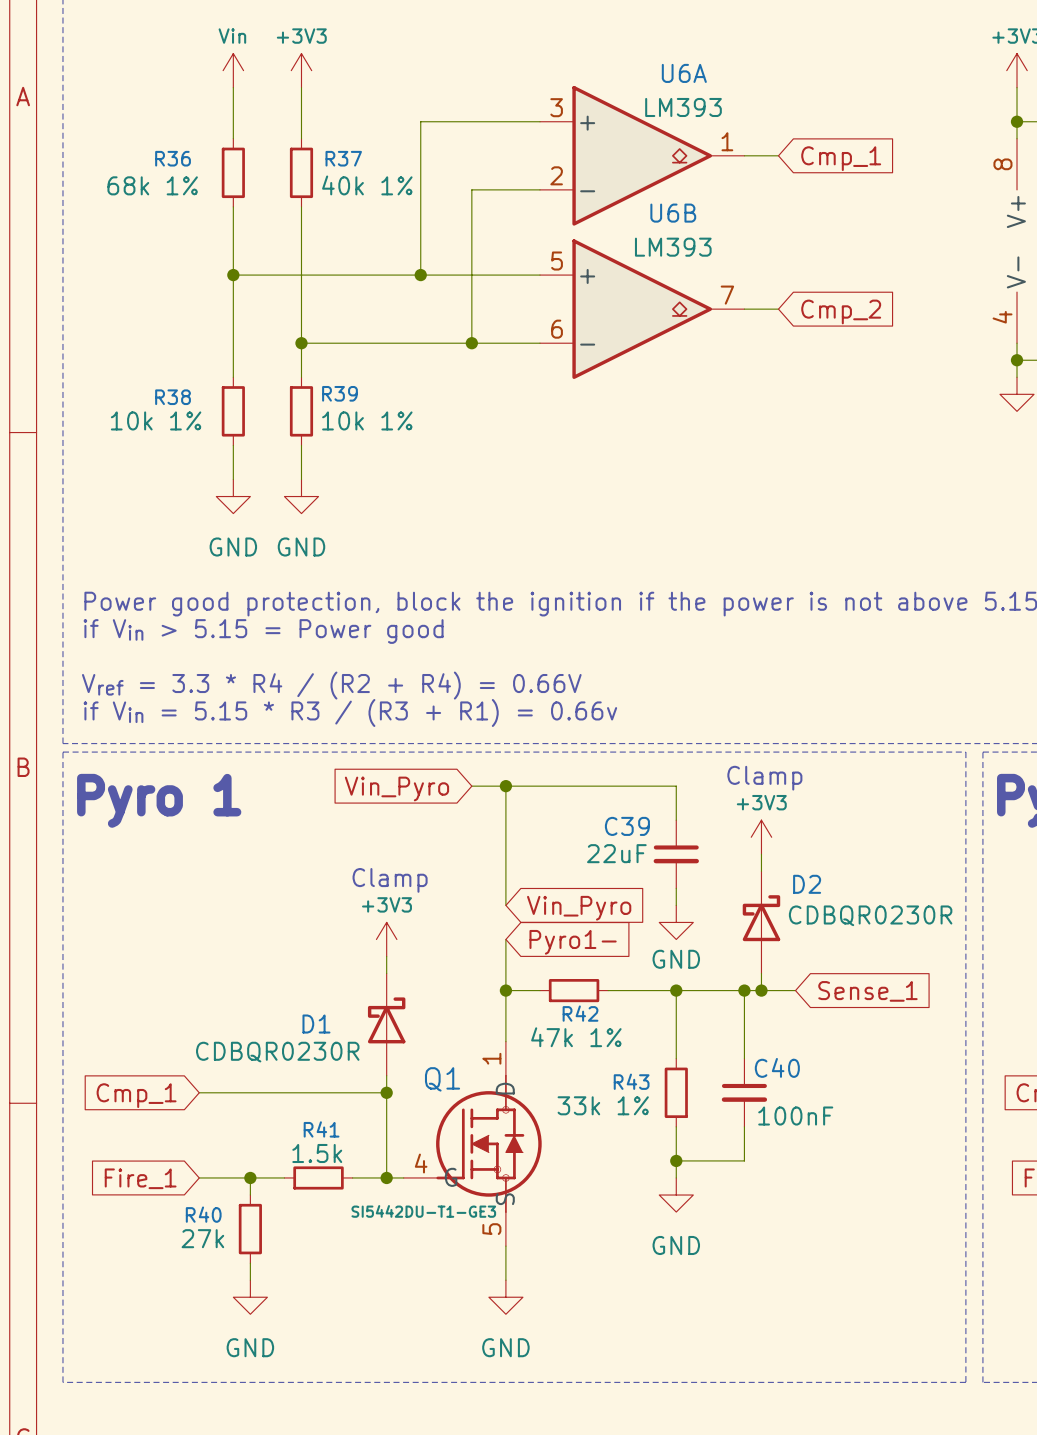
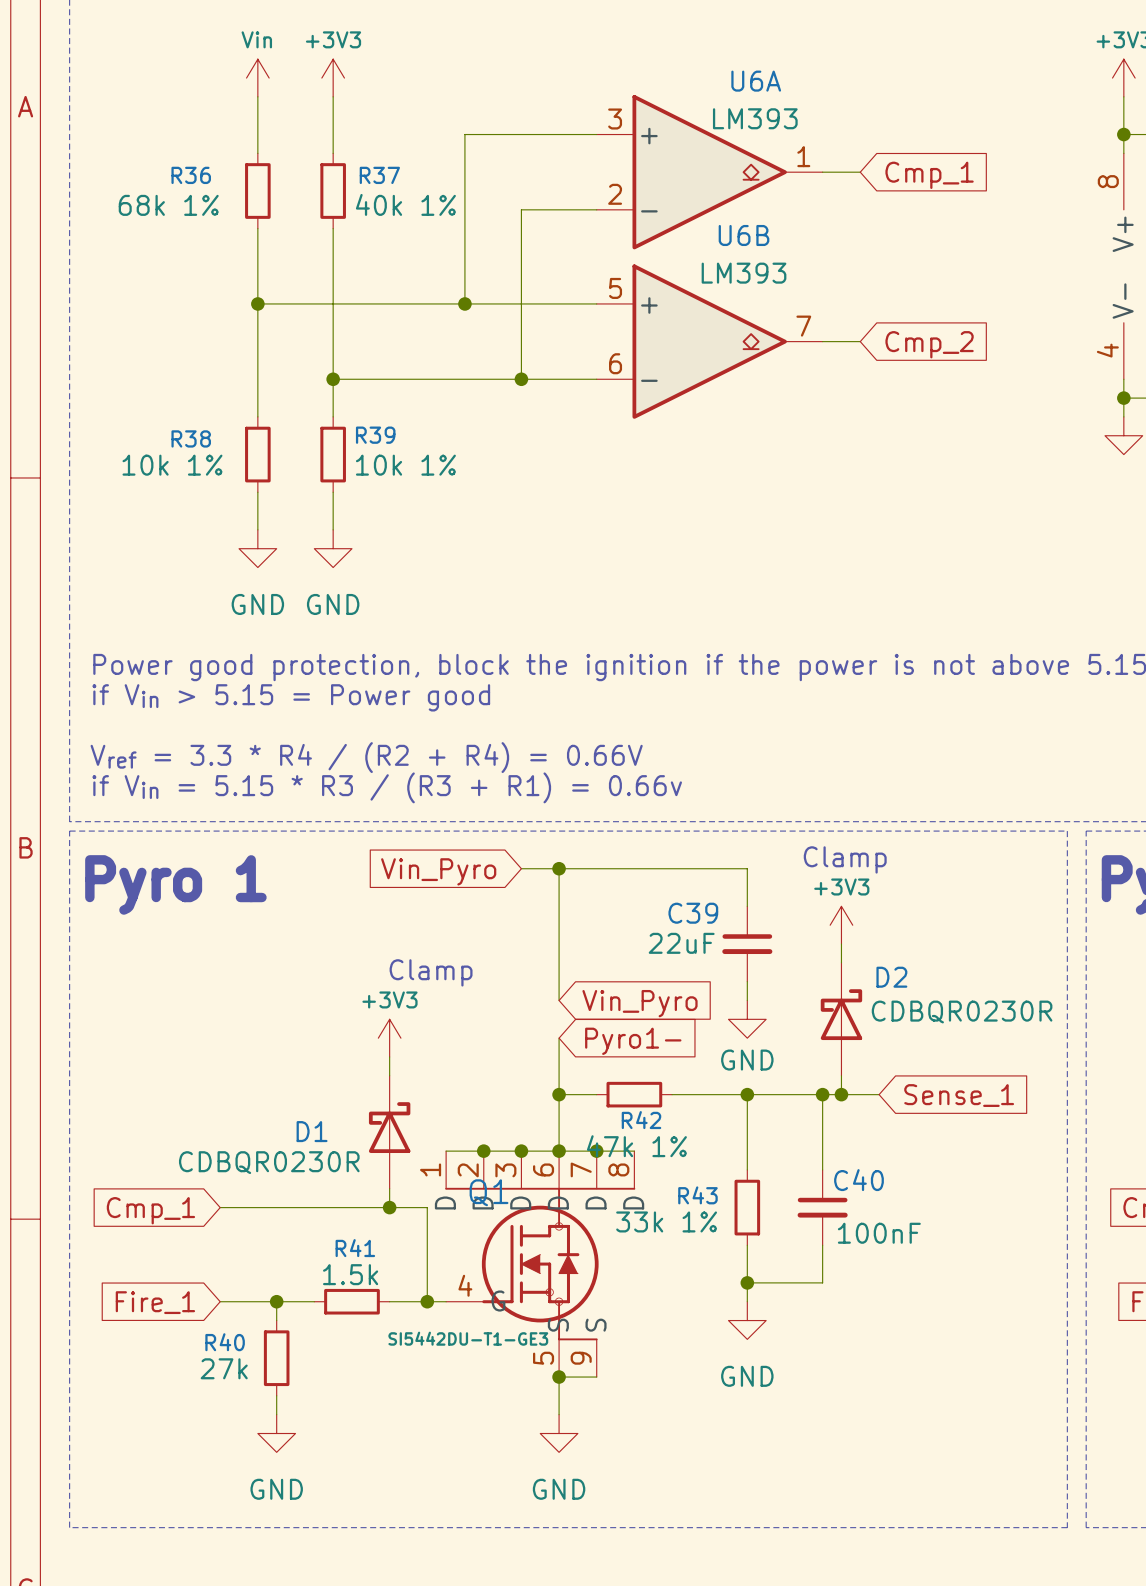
power symbol position: +3V3 (386, 939) -> +3V3 (389, 1038)
wire: (386, 956) (386, 973) -> (389, 1056) (389, 1075)
D1 position: (386, 1024) -> (389, 1132)
wire: none -> (446, 1151) (634, 1151)
Q1 symbol: [403, 1041, 542, 1247] -> [445, 1151, 636, 1378]
junction: none -> (483, 1151)
junction: none -> (521, 1151)
junction: none -> (559, 1151)
junction: none -> (596, 1151)
wire: (386, 1075) (386, 1092) -> (389, 1188) (389, 1207)
junction position: (386, 1092) -> (389, 1207)
wire: none -> (559, 1377) (596, 1377)
junction: none -> (559, 1377)

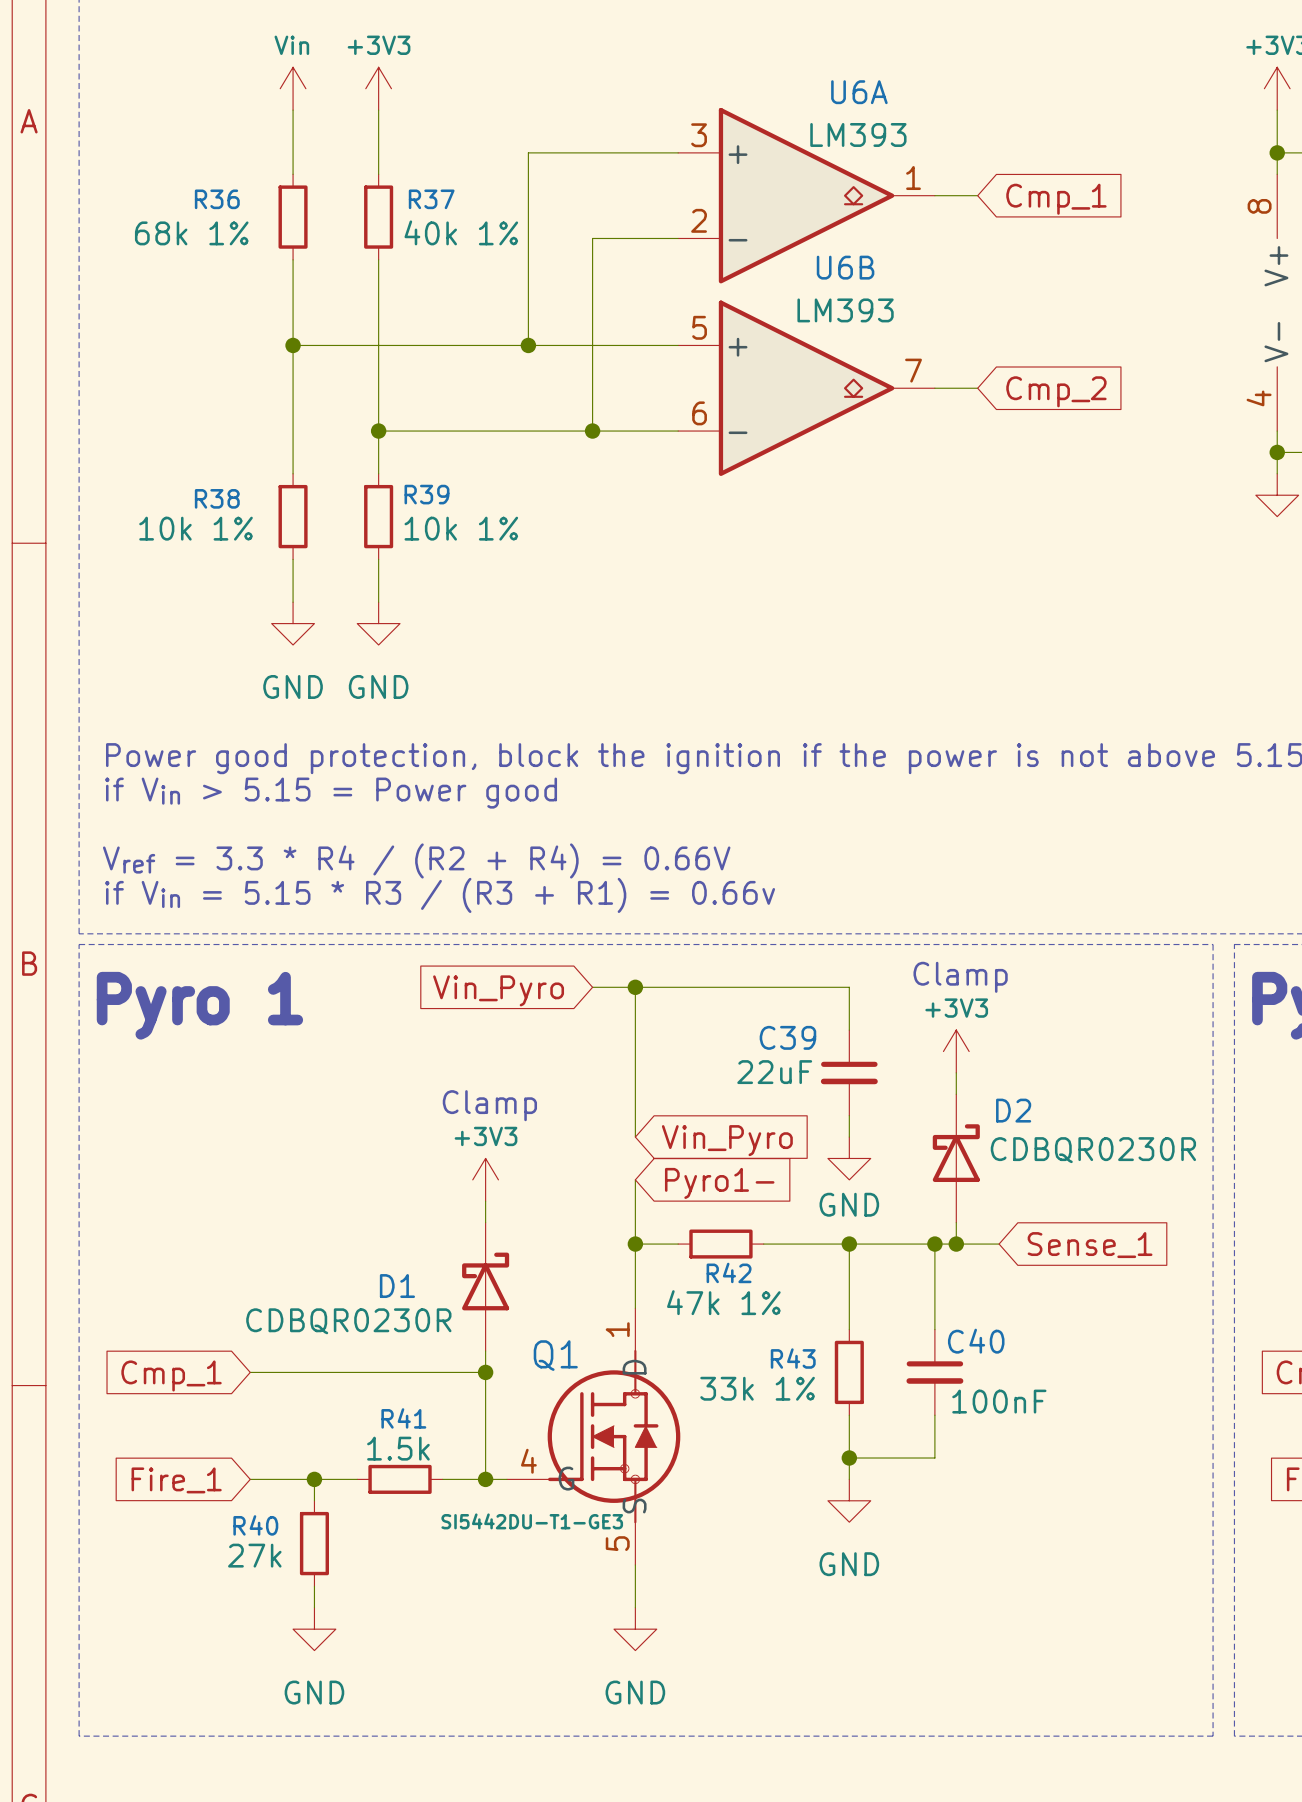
power symbol position: +3V3 (389, 1038) -> +3V3 (485, 1179)
wire: (389, 1056) (389, 1075) -> (485, 1201) (485, 1222)
D1 position: (389, 1132) -> (485, 1286)
Q1 symbol: [445, 1151, 636, 1378] -> [507, 1308, 681, 1565]
wire: (446, 1151) (634, 1151) -> none
junction: (483, 1151) -> none
junction: (521, 1151) -> none
junction: (559, 1151) -> none
junction: (596, 1151) -> none
wire: (389, 1188) (389, 1207) -> (485, 1351) (485, 1372)
junction position: (389, 1207) -> (485, 1372)
wire: (559, 1377) (596, 1377) -> none
junction: (559, 1377) -> none

